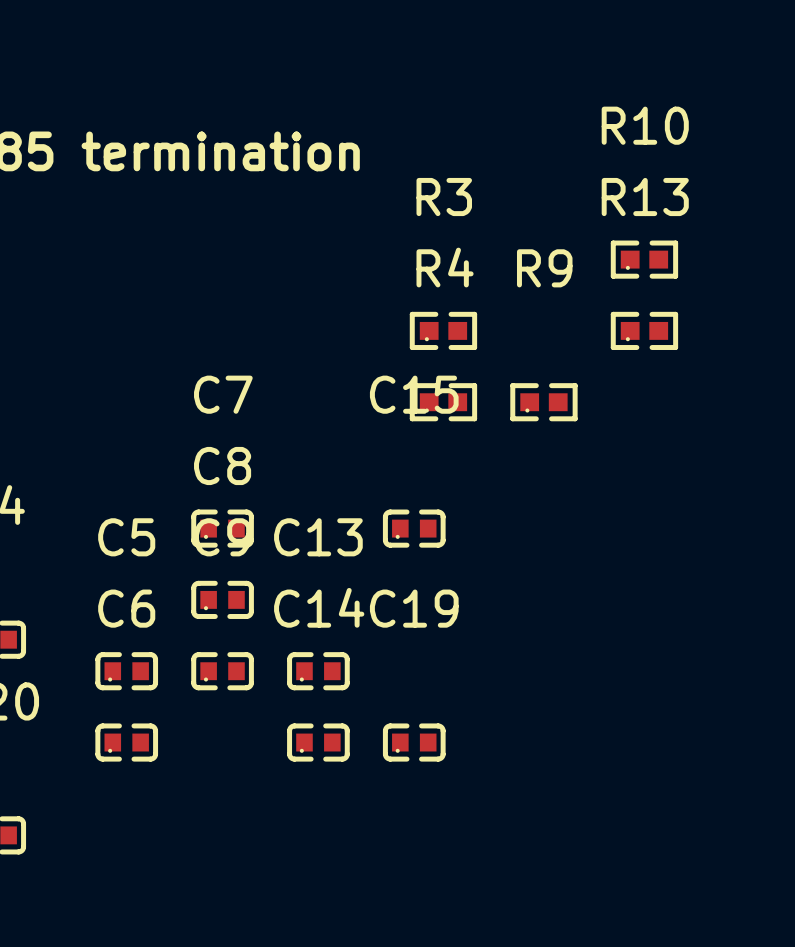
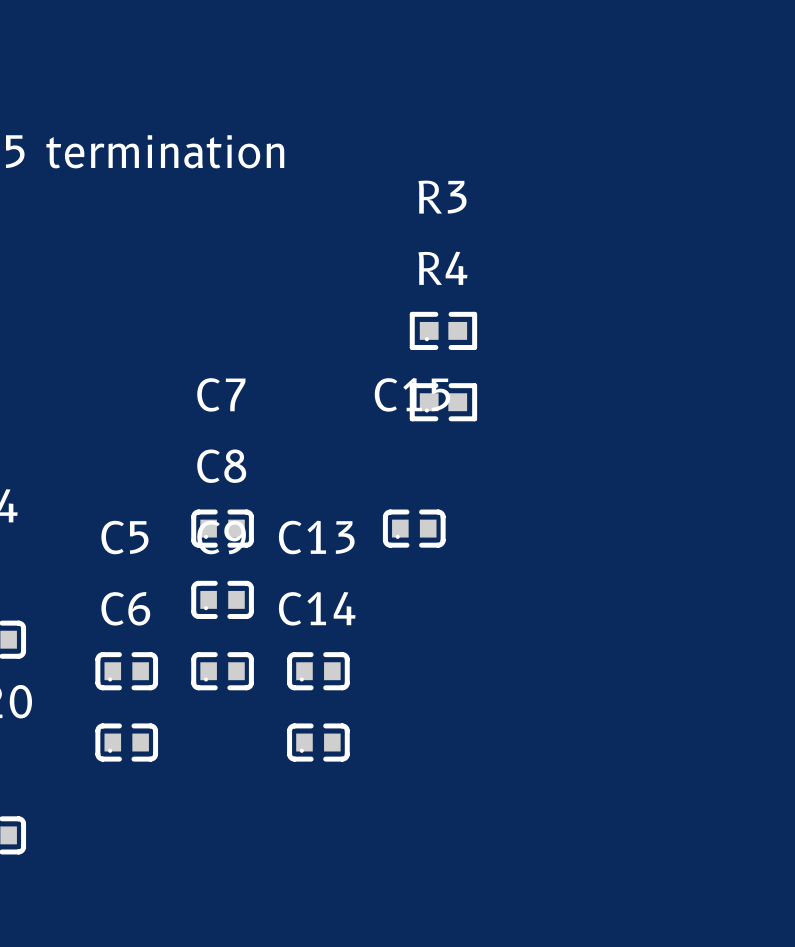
R10: (644, 259) -> none
R13: (644, 330) -> none
R9: (543, 402) -> none
C19: (414, 742) -> none

